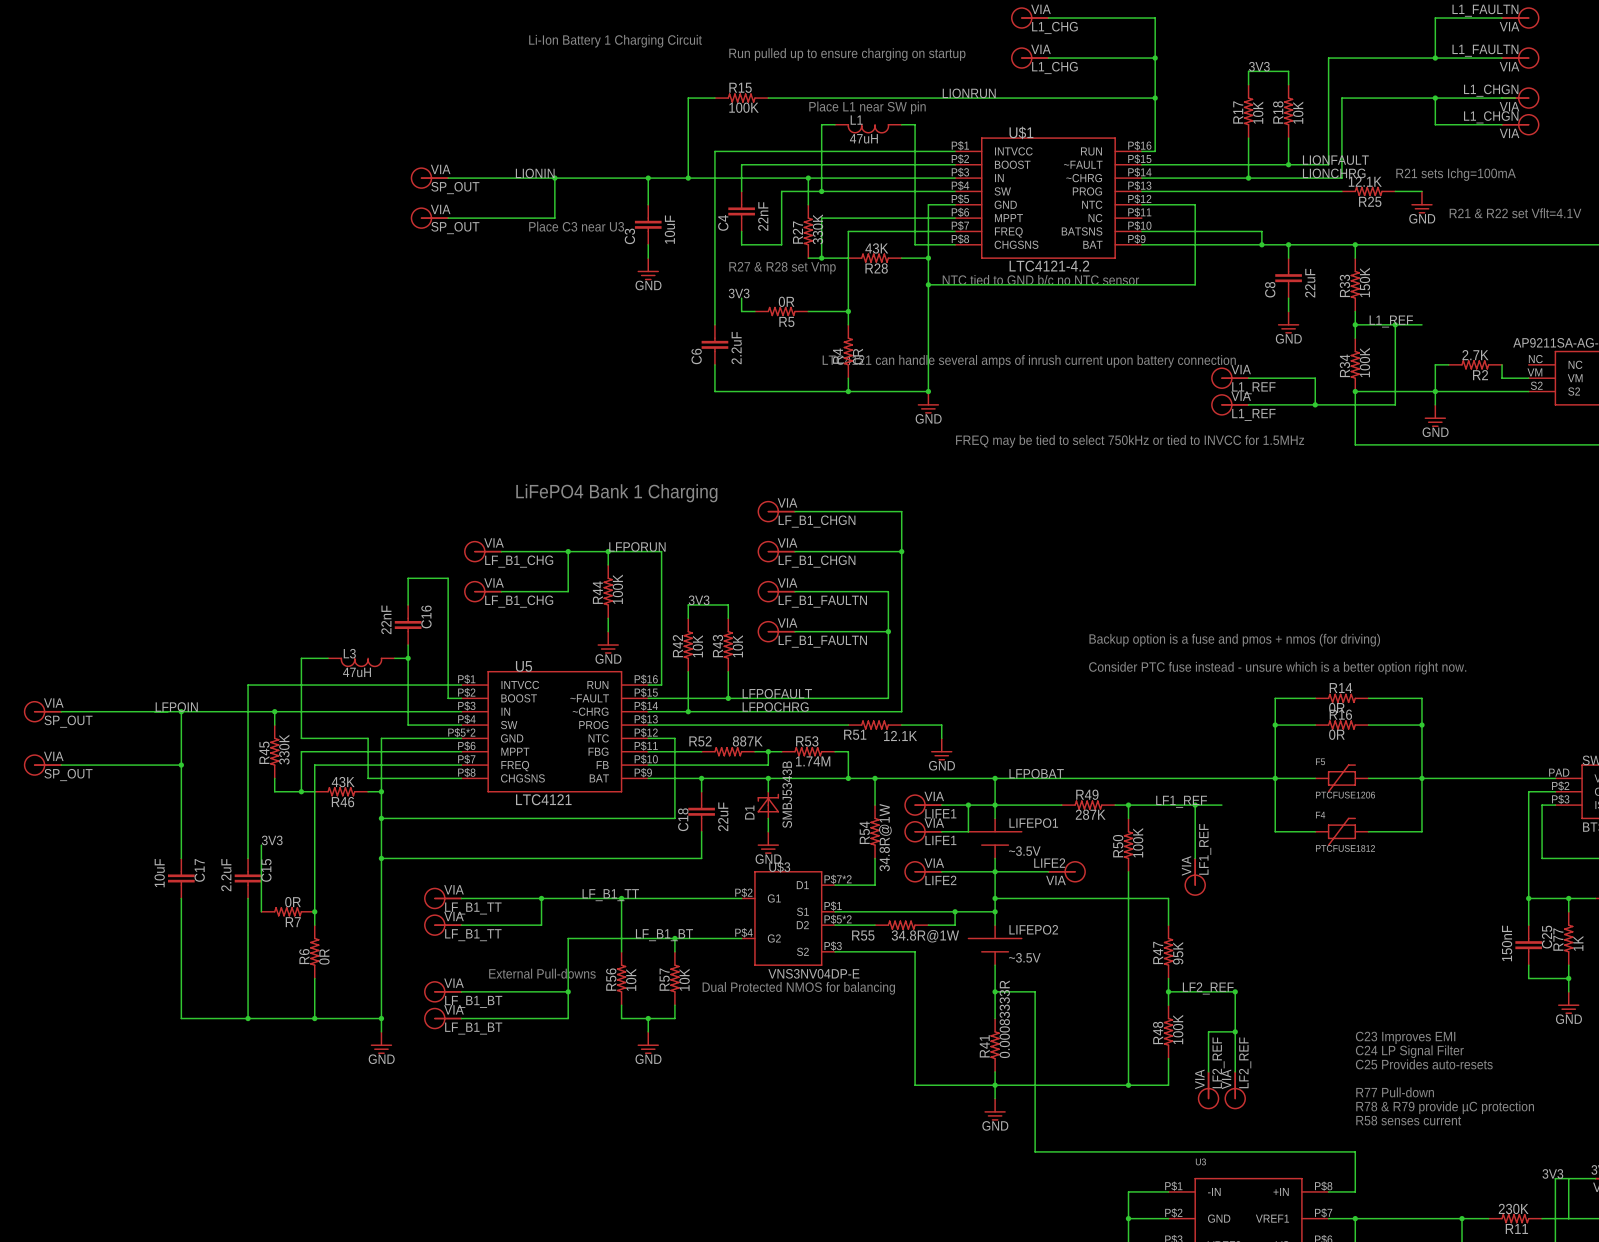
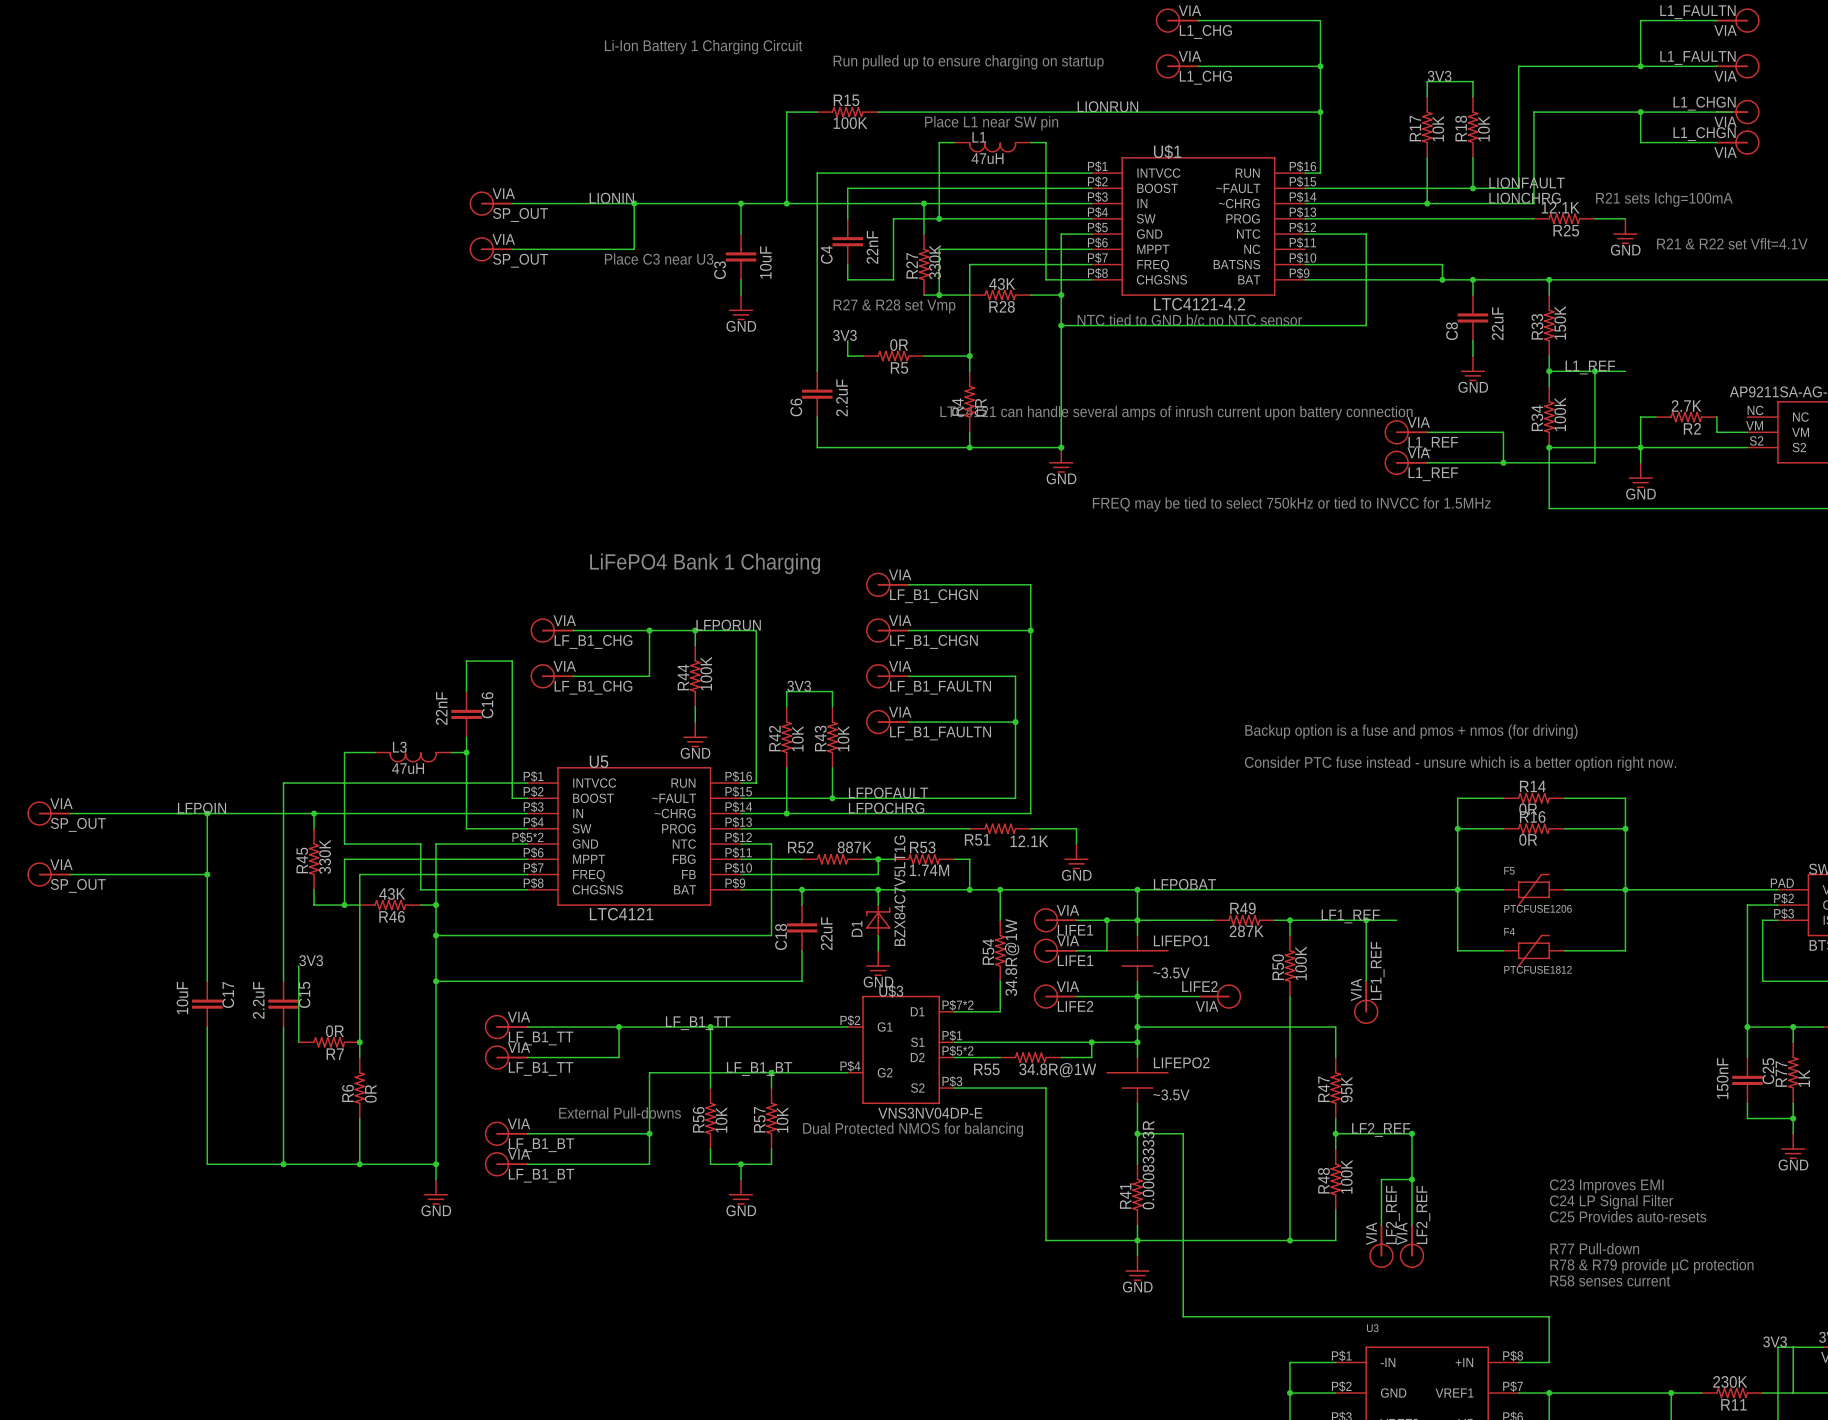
D1 value: SMBJ5343B (787, 794) -> BZX84C7V5LT1G (899, 890)

